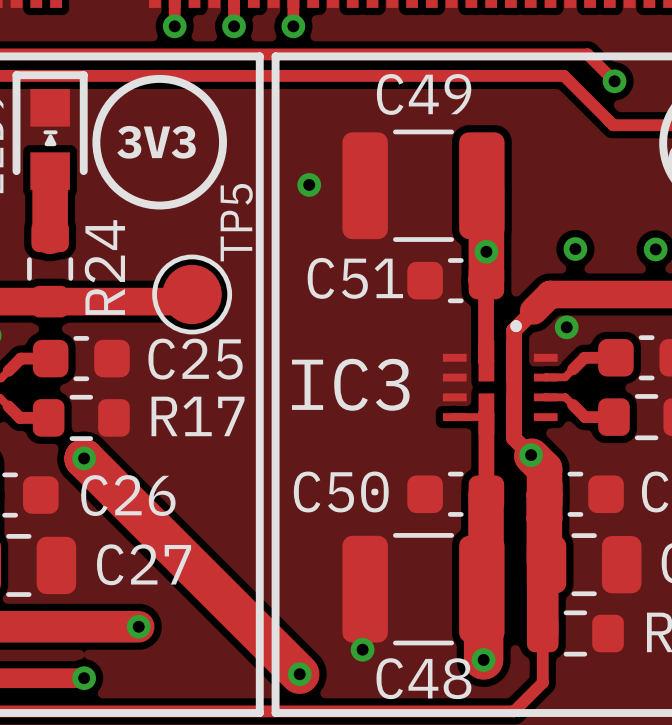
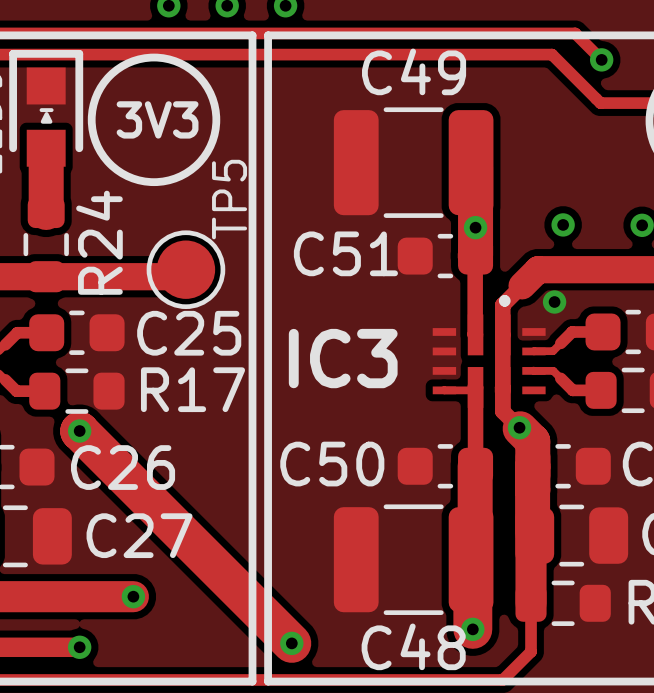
via: (309, 184) -> none
via: (362, 649) -> none

